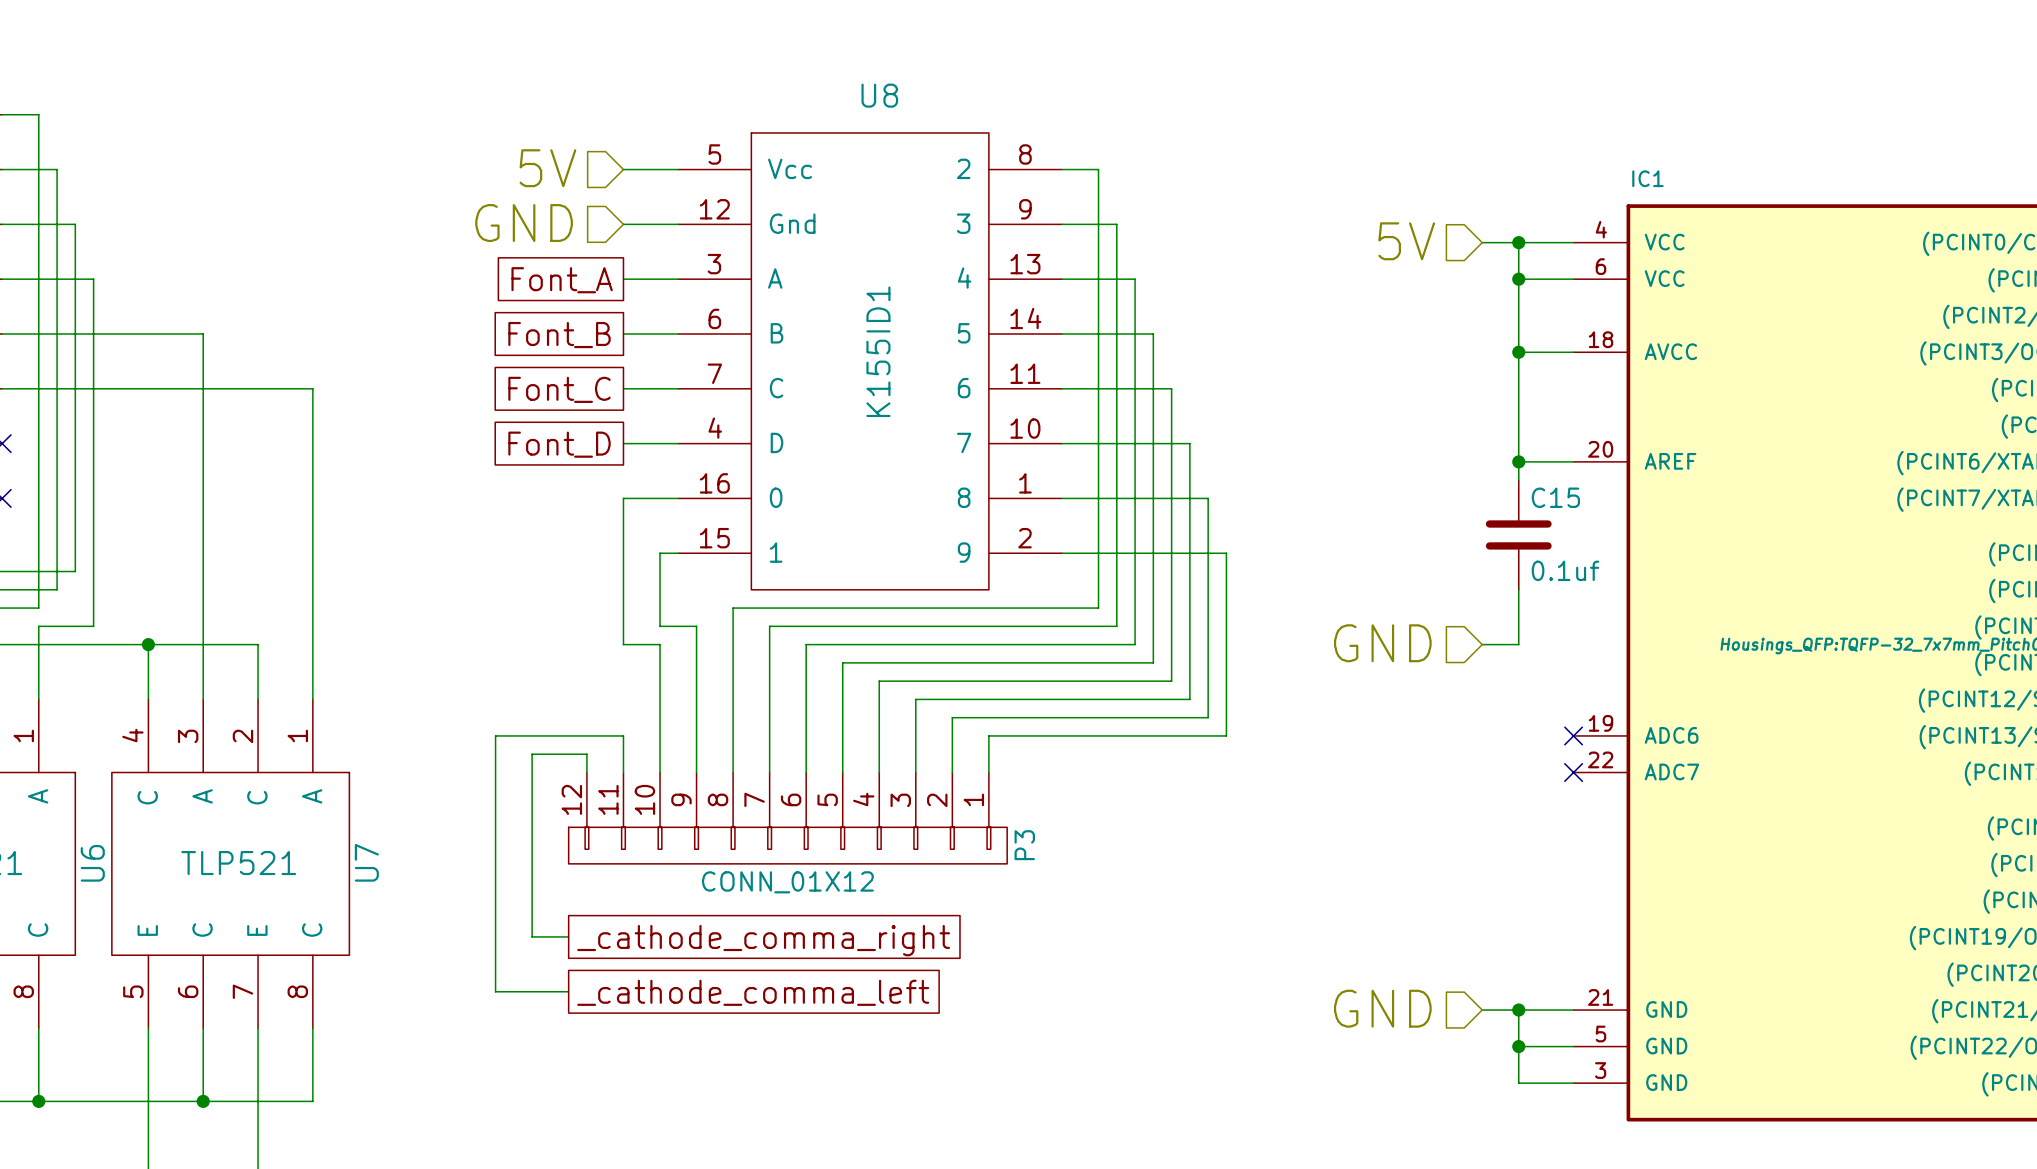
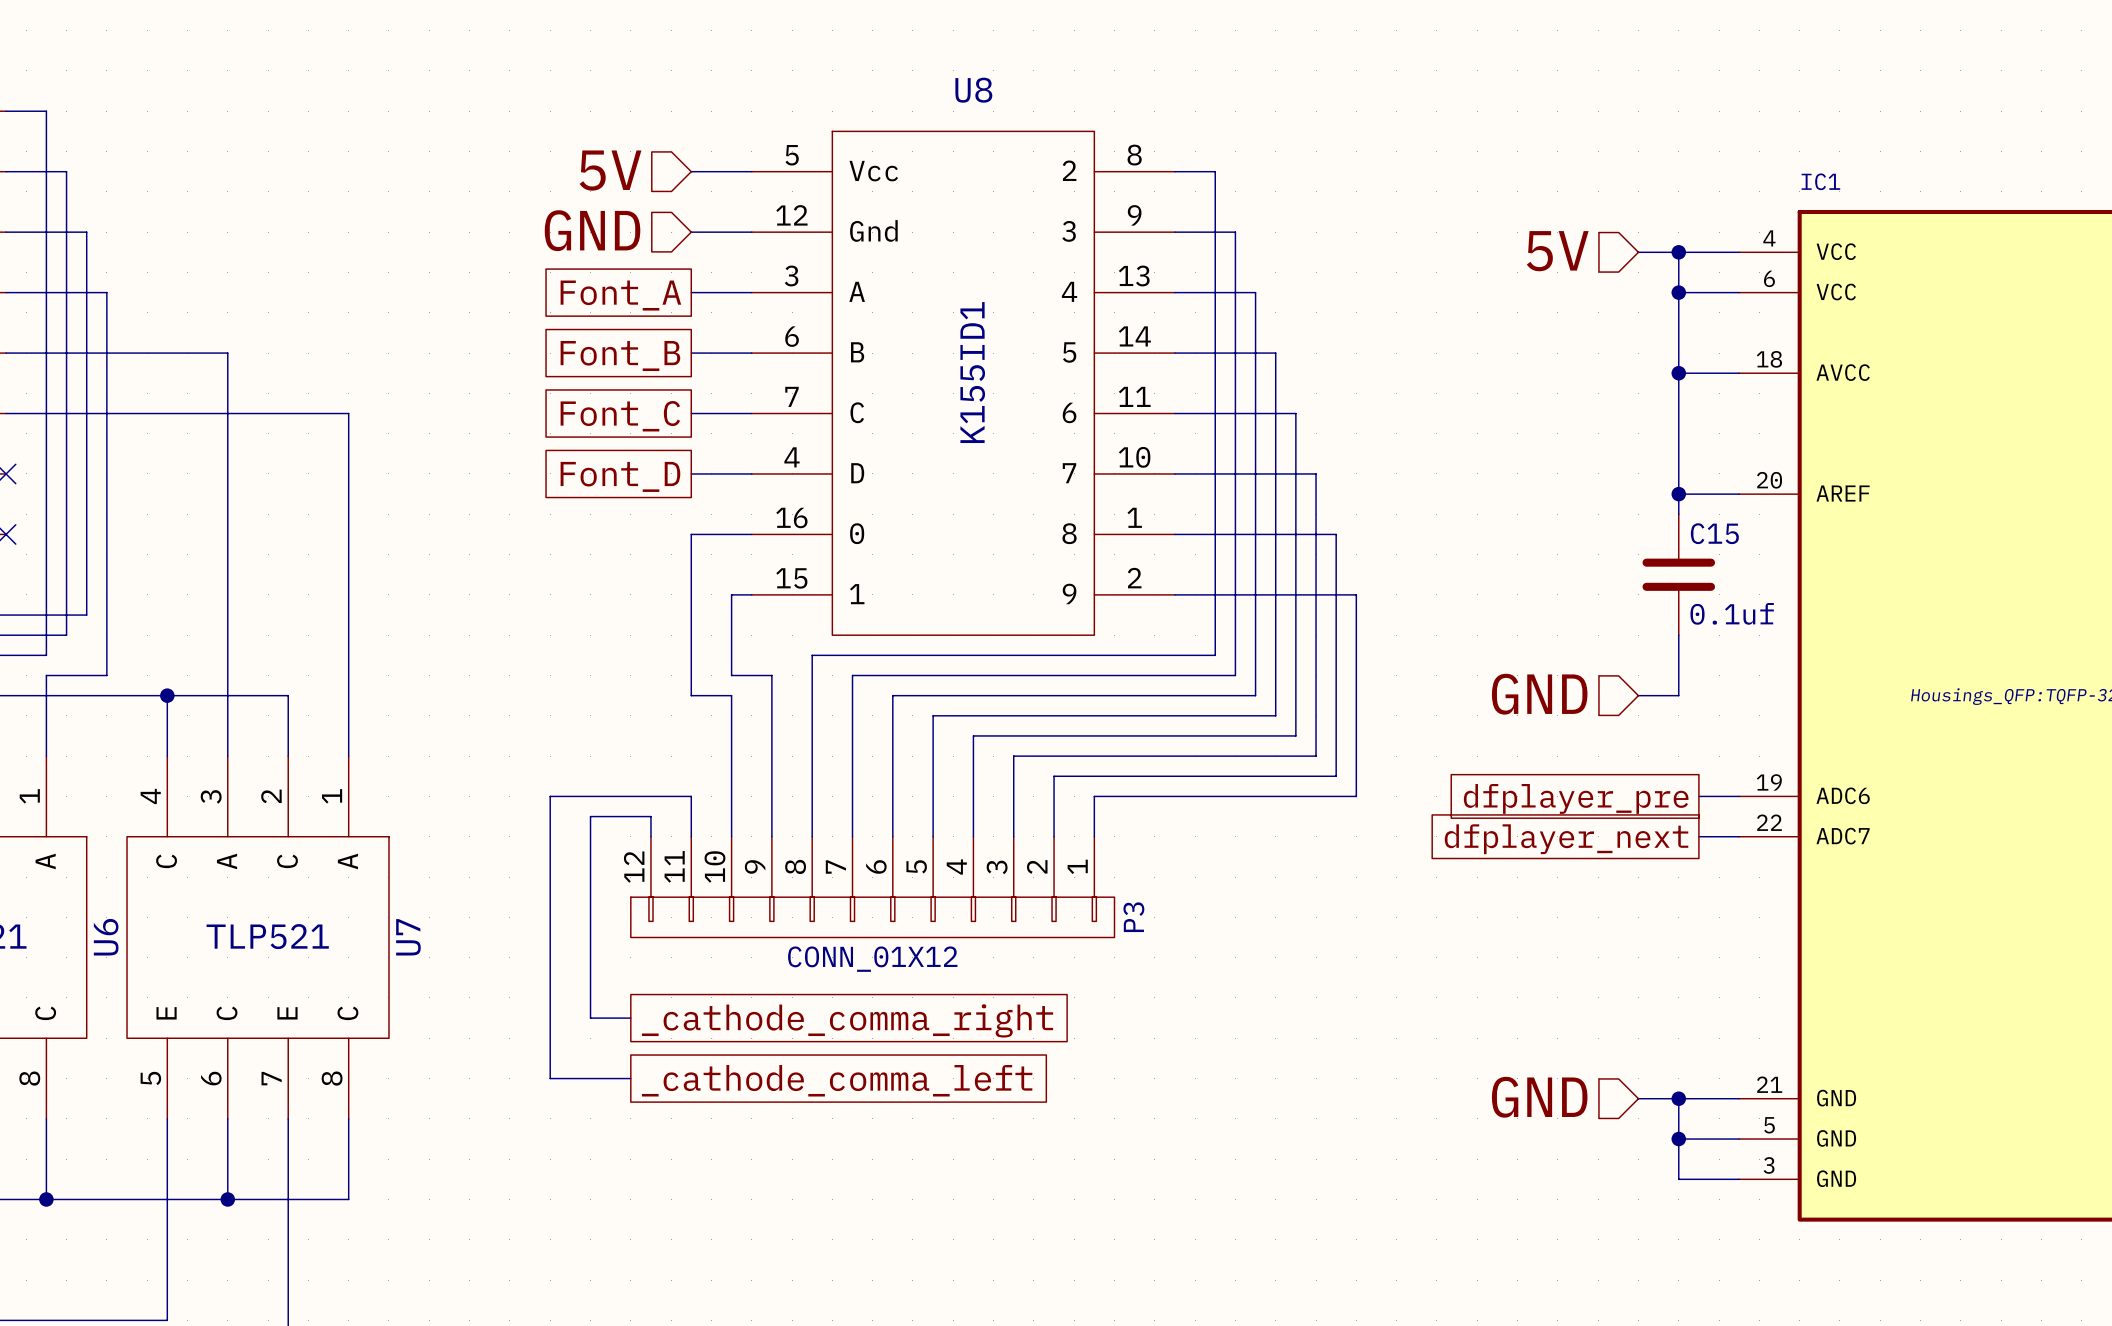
wire: none -> (1698, 796) (1739, 796)
no-connect mark: (1573, 735) -> none
global label: none -> dfplayer_pre (1576, 798)
wire: none -> (1698, 836) (1739, 836)
no-connect mark: (1573, 772) -> none
global label: none -> dfplayer_next (1566, 839)

